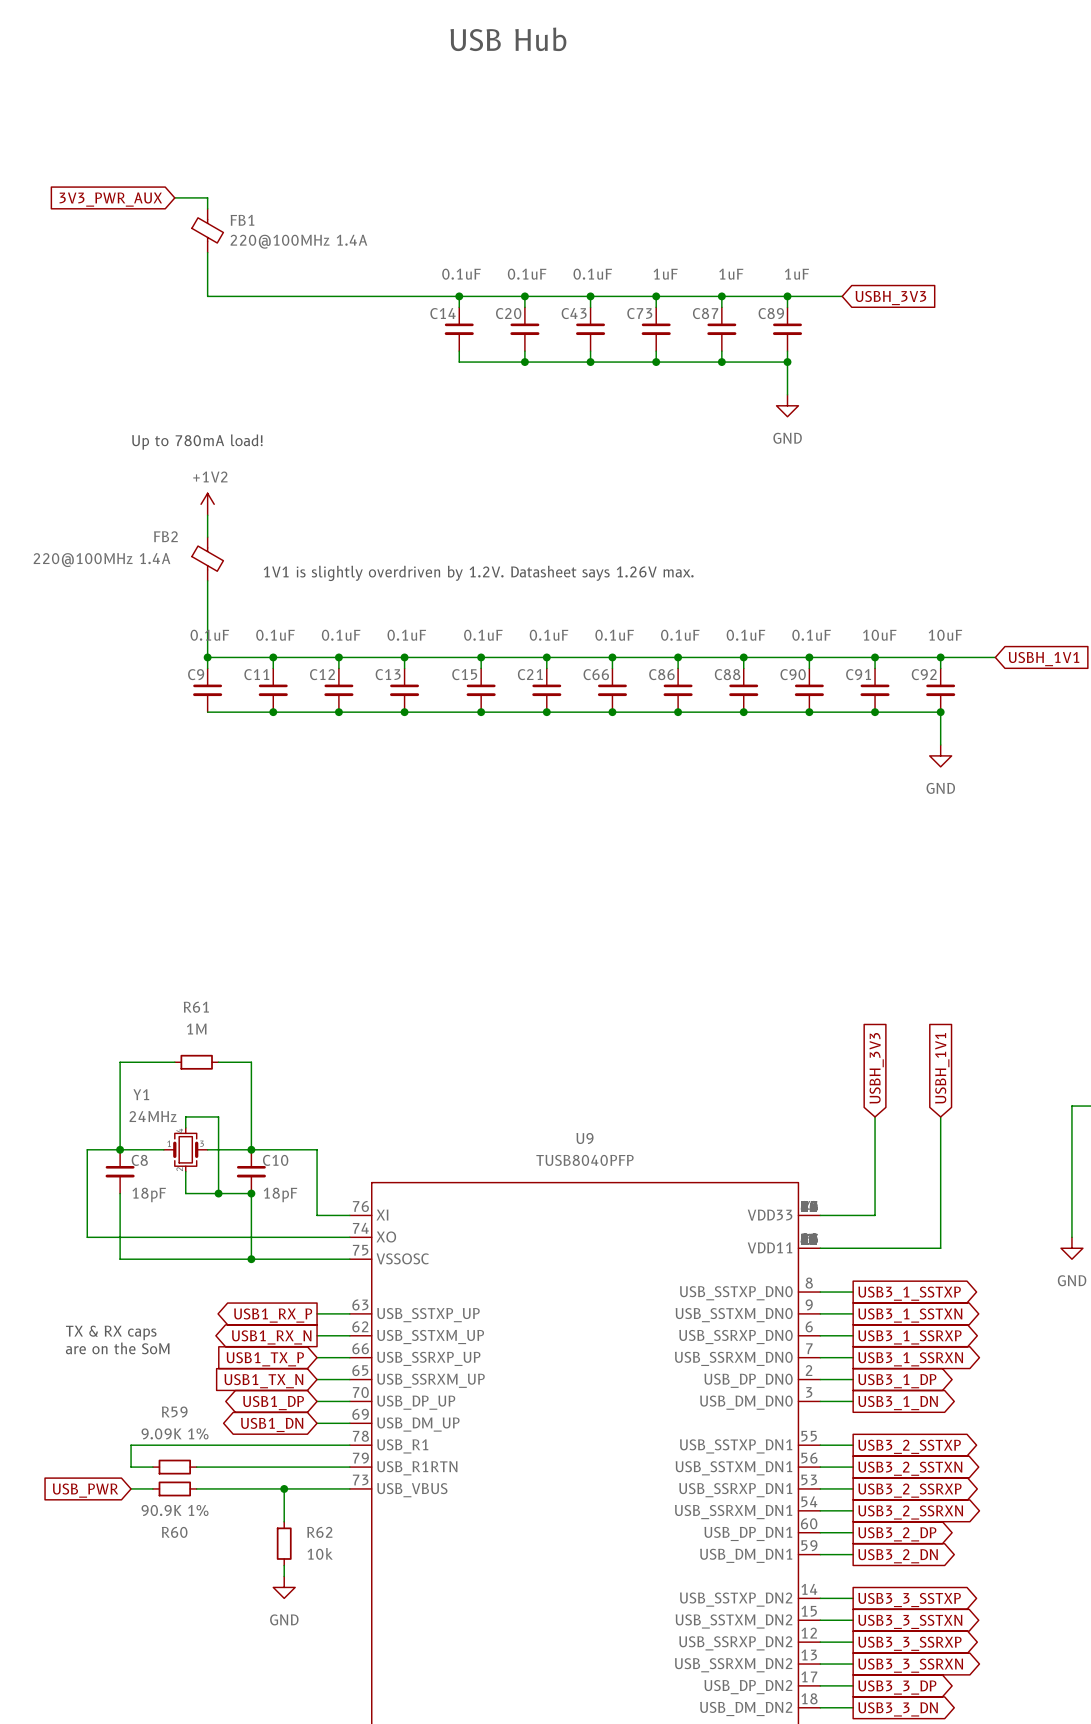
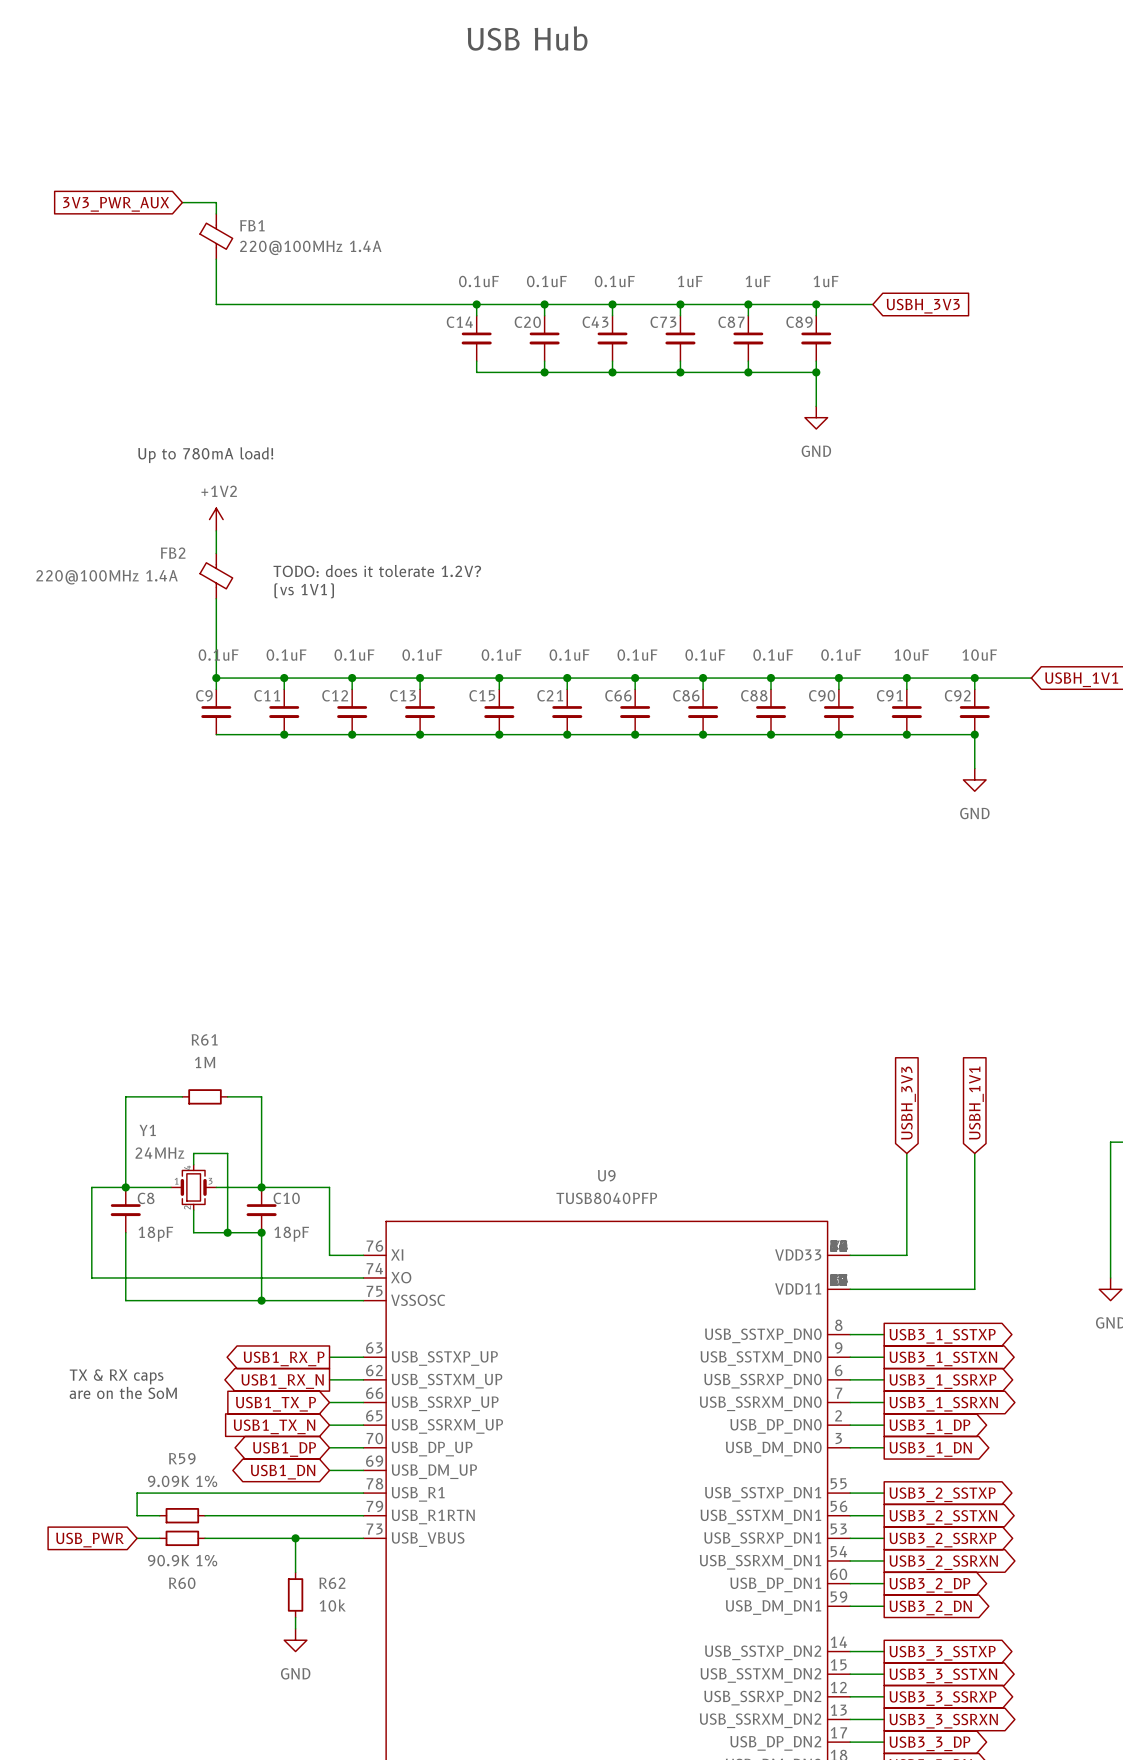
text: none -> TODO: does it tolerate 1.2V? (377, 571)
text: 1V1 is slightly overdriven by 1.2V. Datasheet says 1.26V max. (478, 573) -> (vs 1V1) (304, 590)

